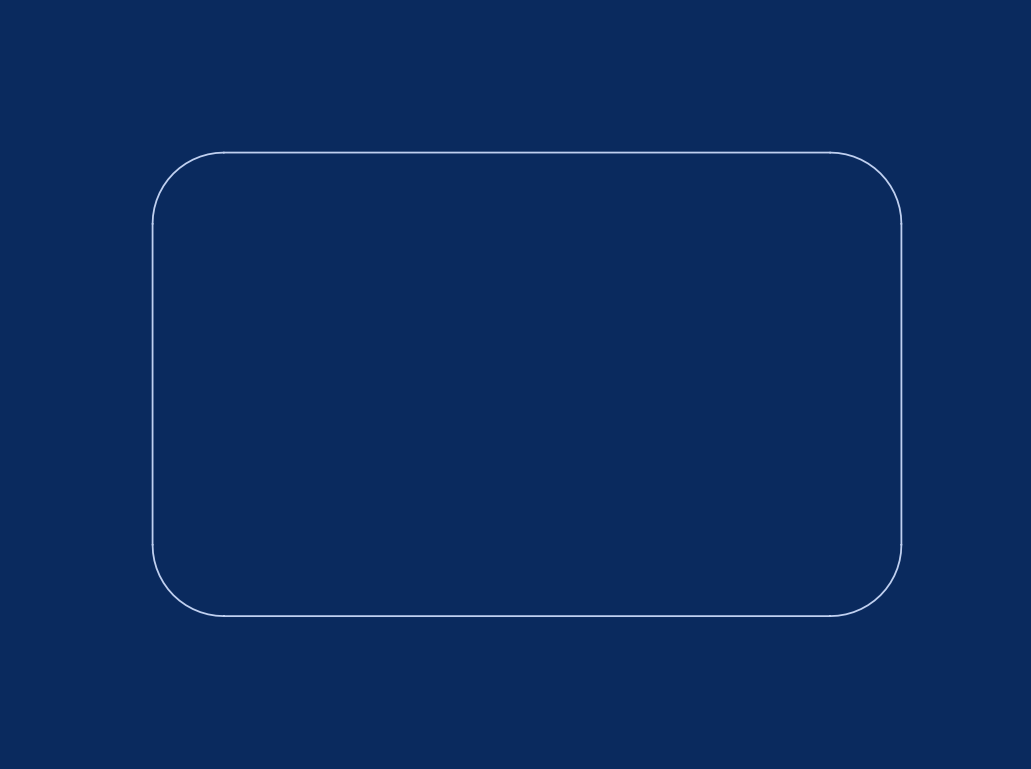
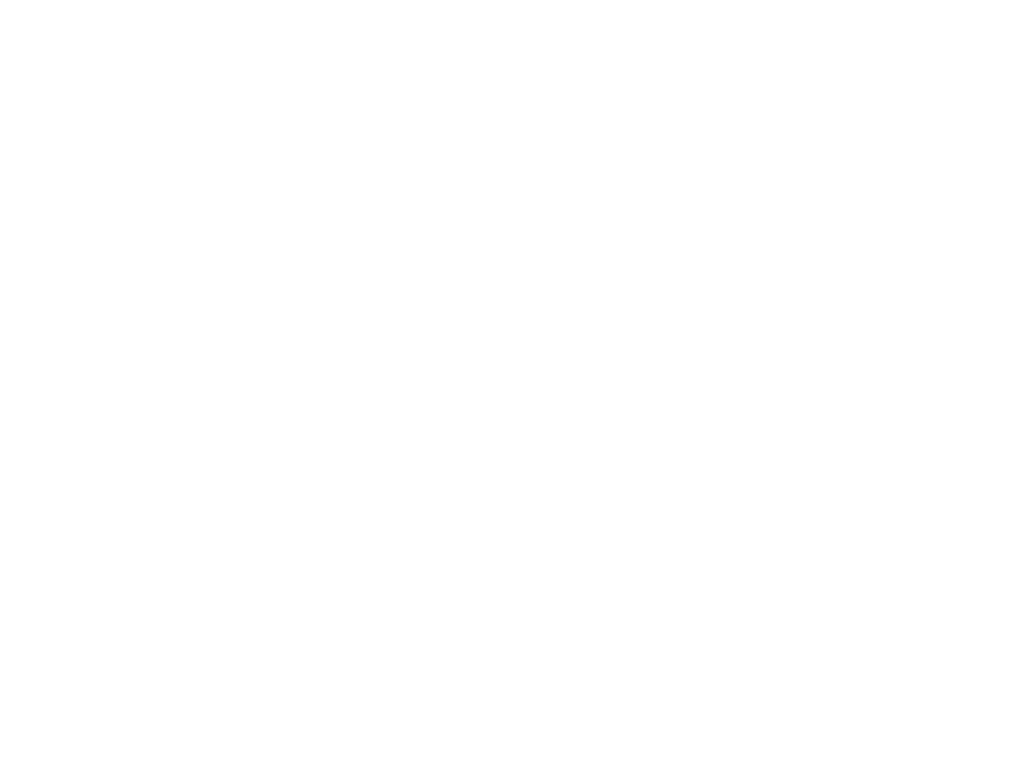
board edge: (830, 152) (223, 152) (208, 154) (185, 163) (173, 173) (163, 185) (156, 200) (152, 223) (152, 544) (156, 568) (163, 582) (173, 595) (192, 609) (208, 614) (223, 616) (830, 616) (853, 612) (868, 605) (880, 595) (890, 582) (897, 568) (900, 552) (900, 215) (894, 192) (880, 173) (861, 159) (845, 154) (830, 152) -> none

